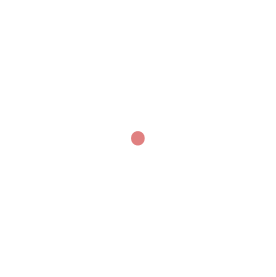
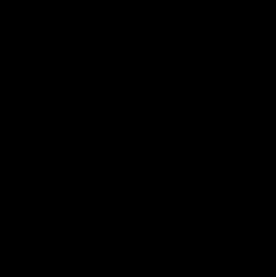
top track: (137, 137) (137, 138) -> none

